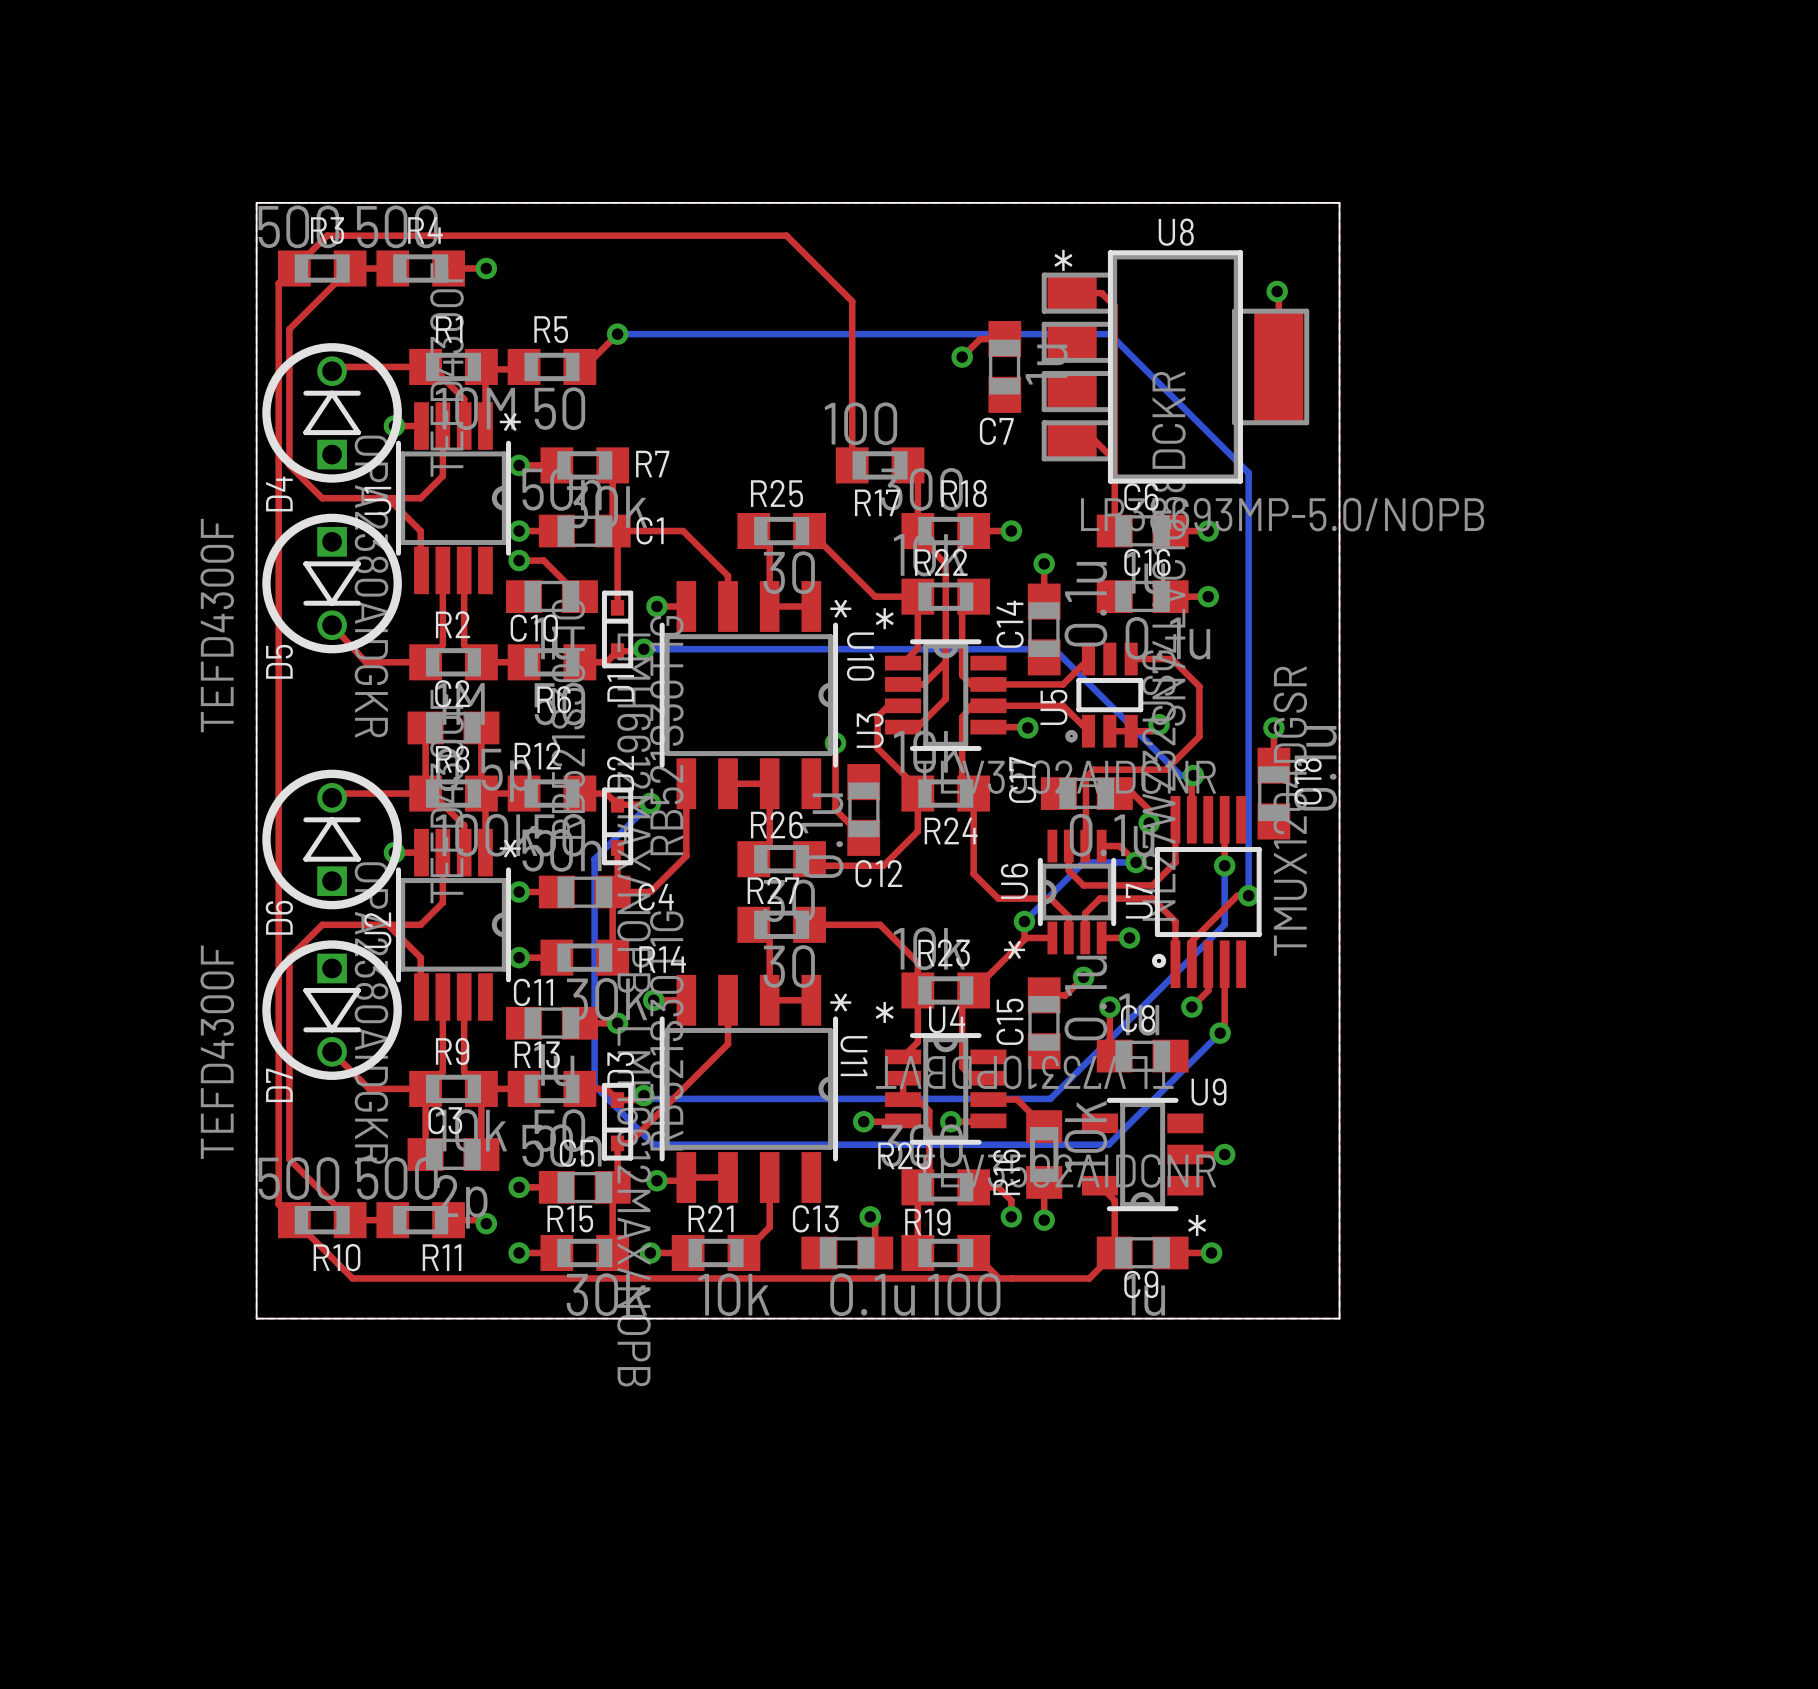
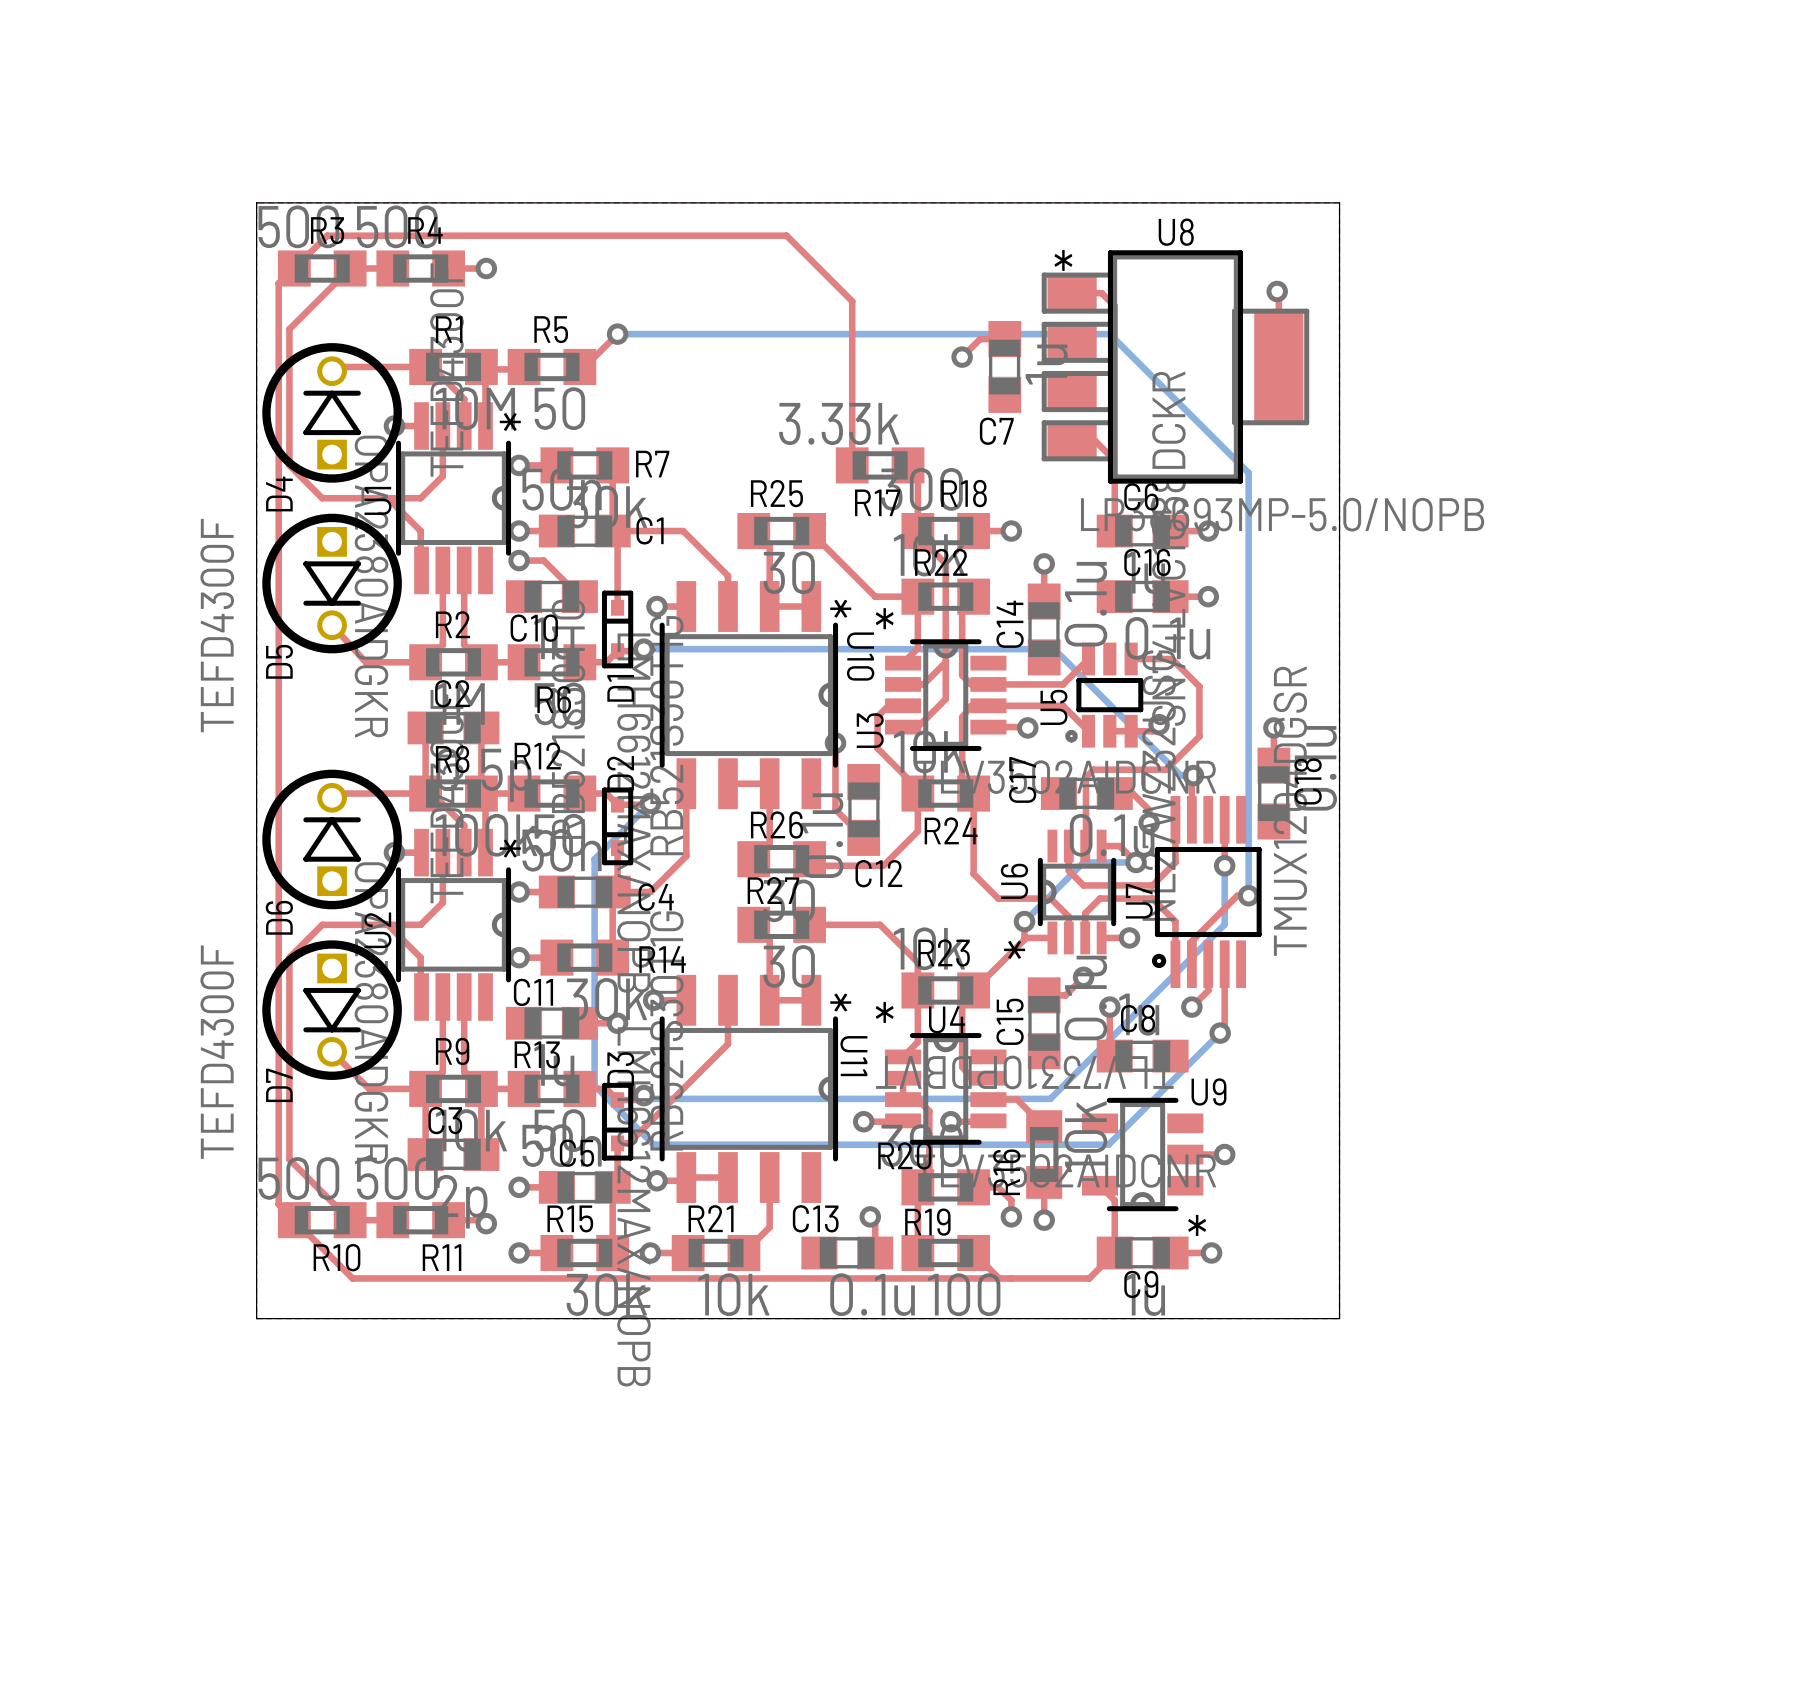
R17 value: 100 (860, 423) -> 3.33k (839, 423)

